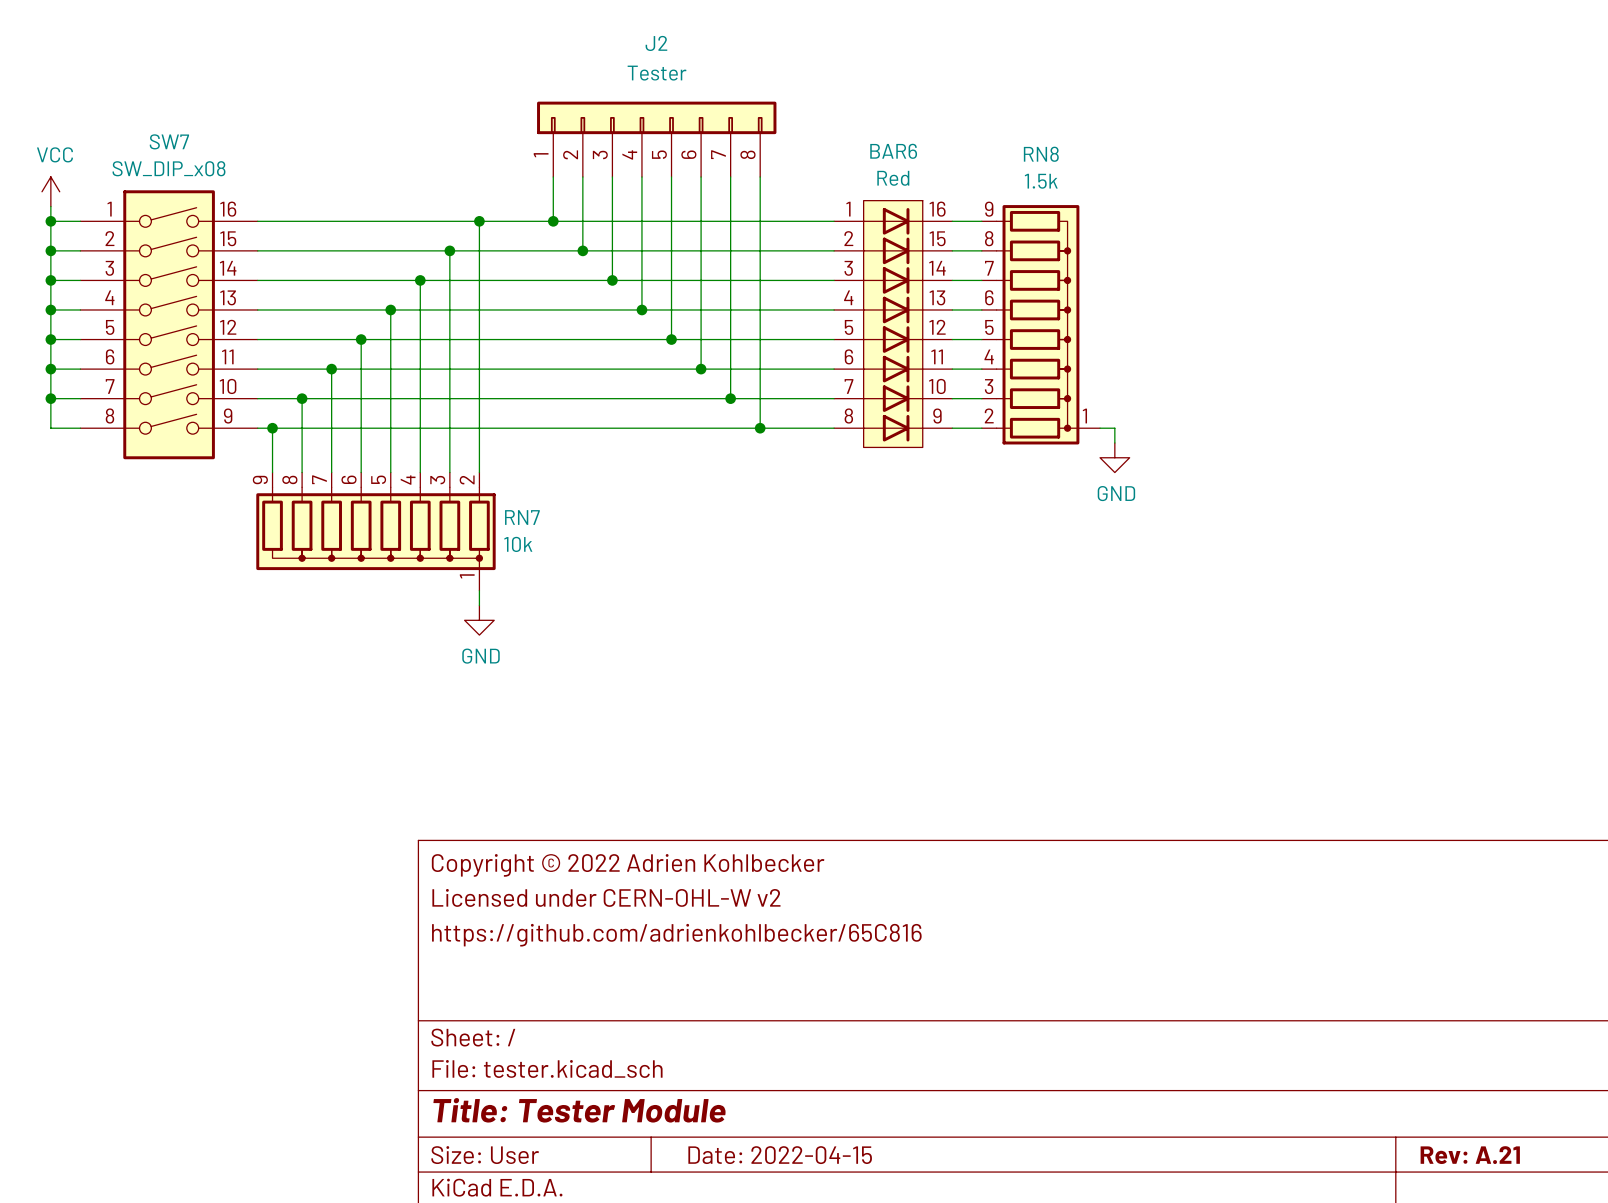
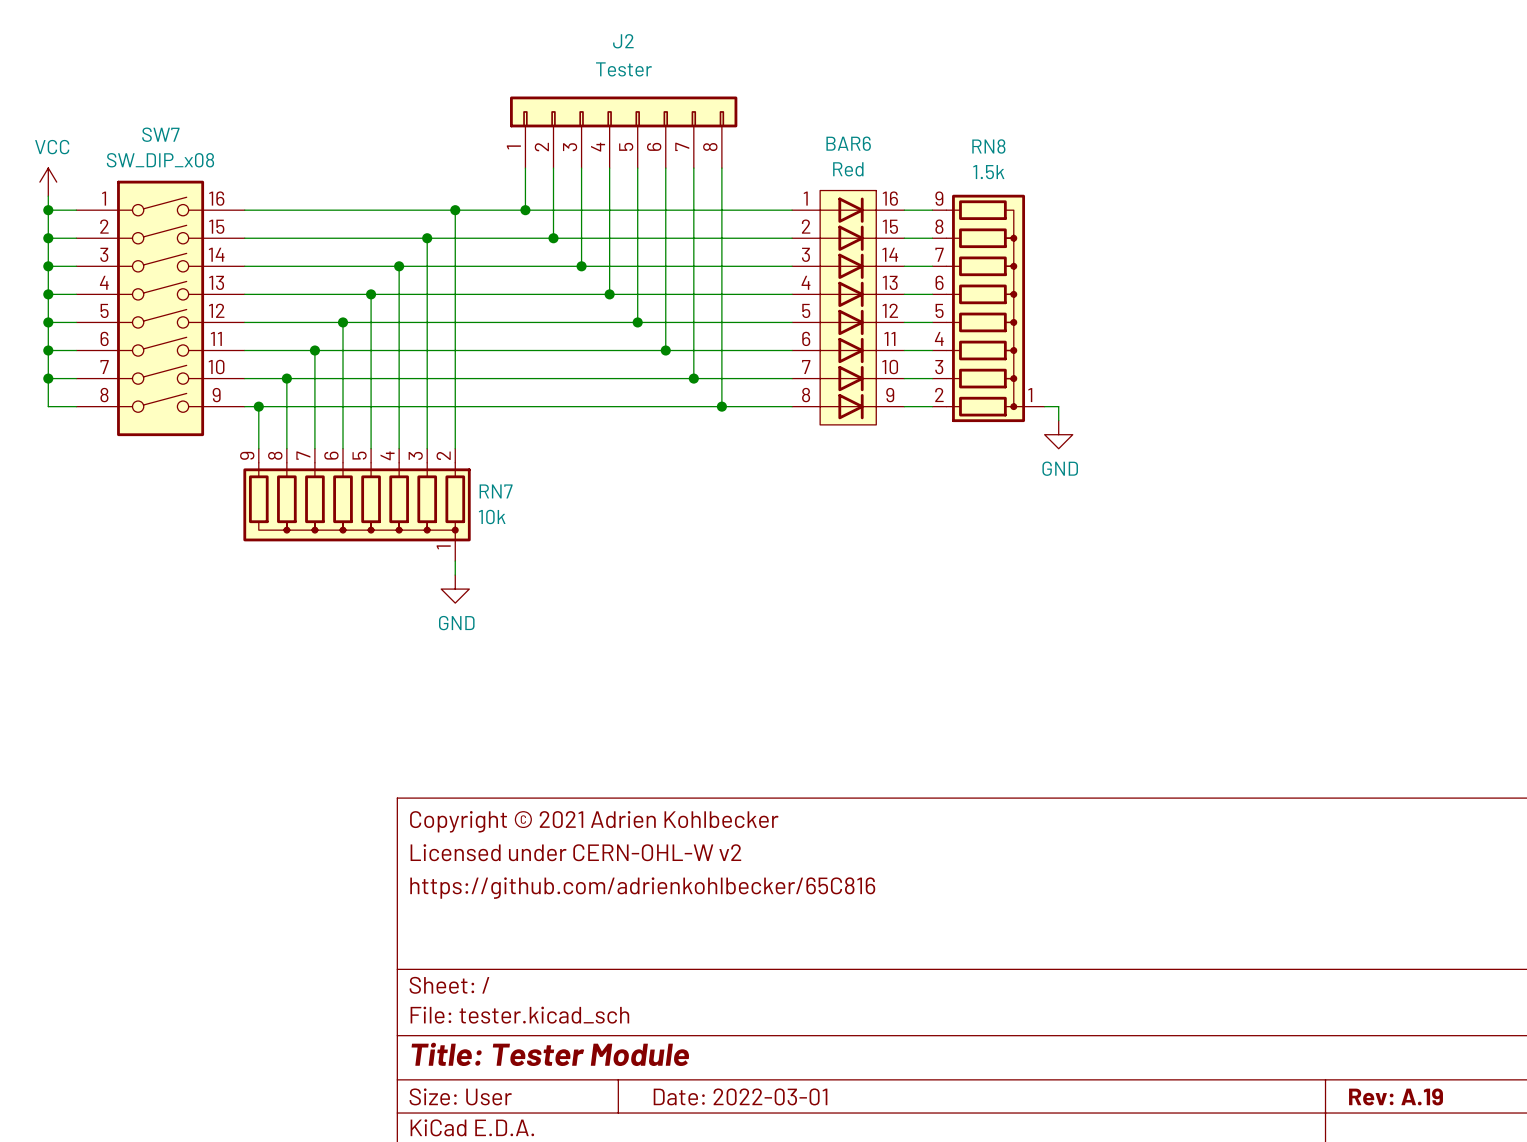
title block: Copyright © 2022 Adrien Kohlbecker (628, 865) -> Copyright © 2021 Adrien Kohlbecker (594, 821)
title block: Date: 2022-04-15 (780, 1155) -> Date: 2022-03-01 (740, 1096)
title block: Rev: A.21 (1470, 1155) -> Rev: A.19 (1396, 1096)

